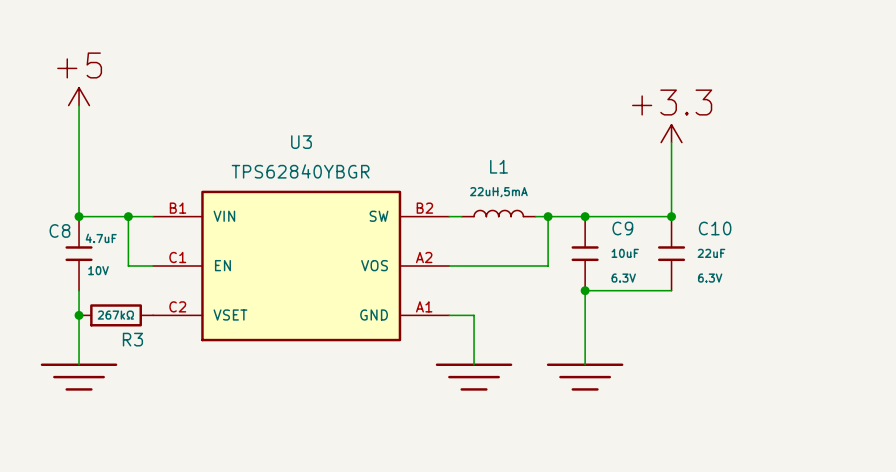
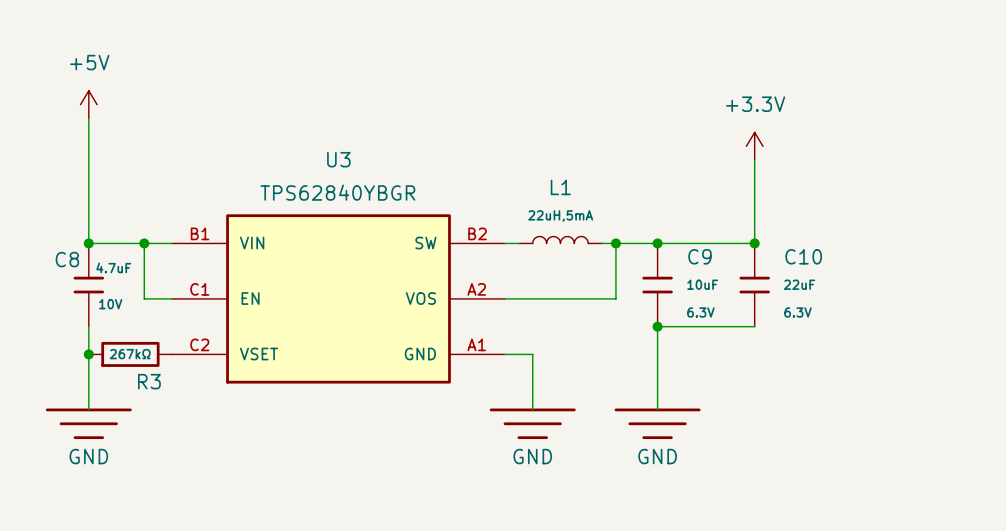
power symbol text: none -> +5V (89, 62)
power symbol shape: [68, 87, 90, 106] -> [80, 90, 98, 119]
power symbol text: none -> +3.3V (755, 104)
power symbol shape: [661, 124, 682, 143] -> [746, 132, 764, 161]
power symbol text: none -> GND (88, 456)
power symbol text: none -> GND (532, 456)
power symbol text: none -> GND (657, 456)

